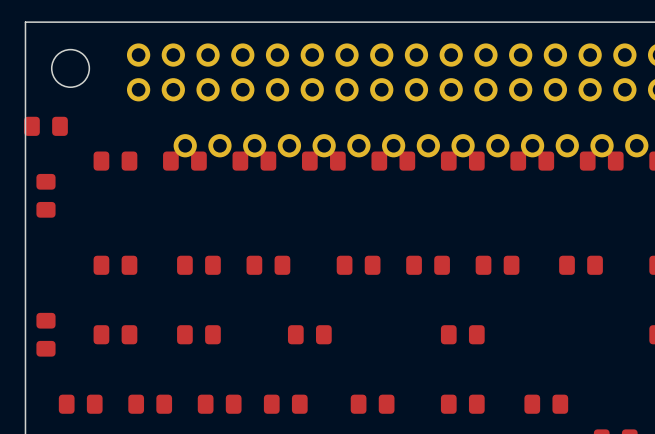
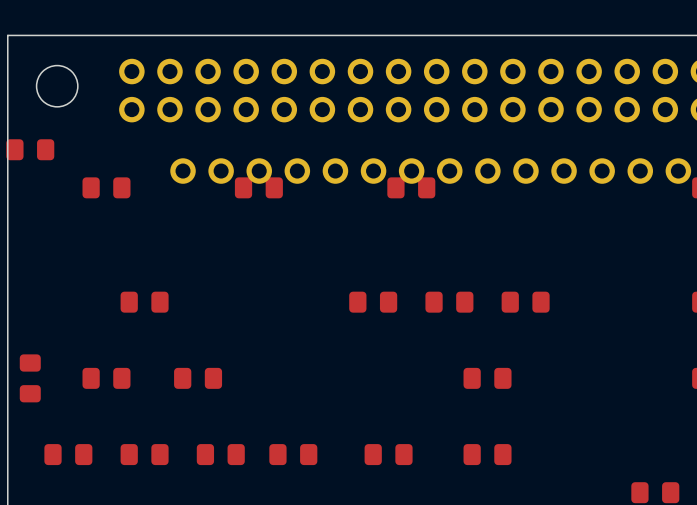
part: (184, 161) -> none
part: (323, 161) -> none
part: (462, 161) -> none
part: (532, 161) -> none
part: (601, 161) -> none
part: (45, 195) -> none
part: (115, 265) -> none
part: none -> (144, 302)
part: (198, 265) -> none
part: (268, 265) -> none
part: (581, 265) -> none
part: (309, 334) -> none
part: (546, 404) -> none

